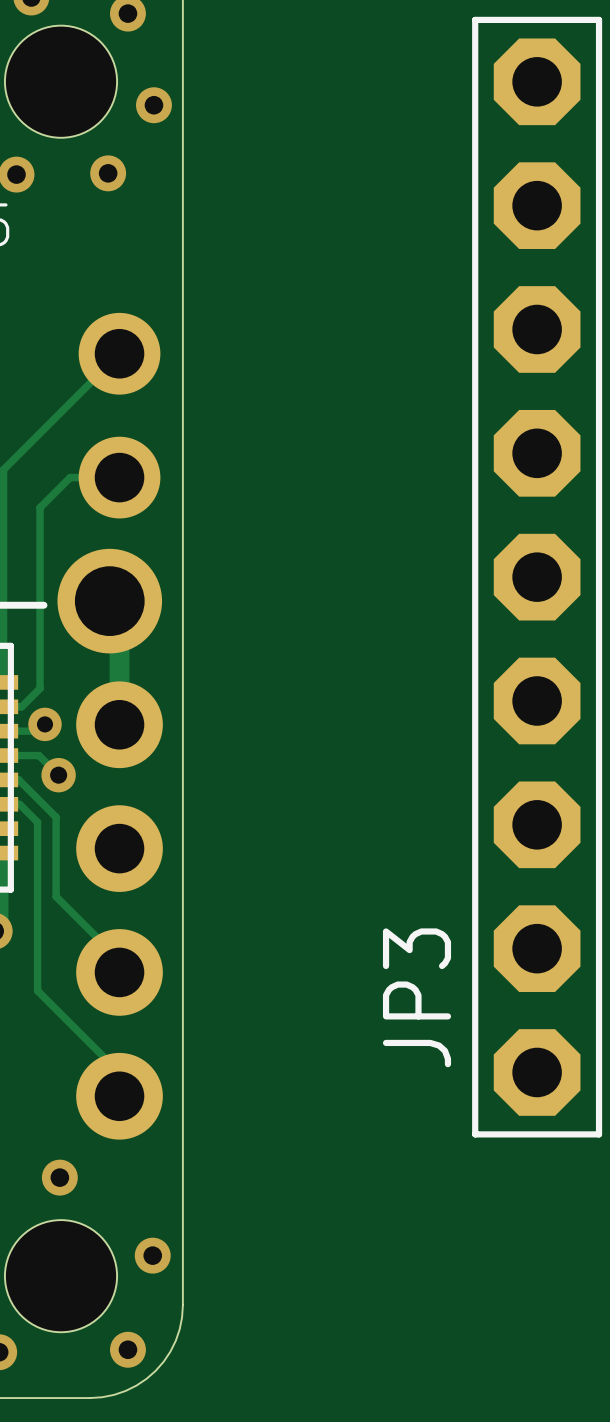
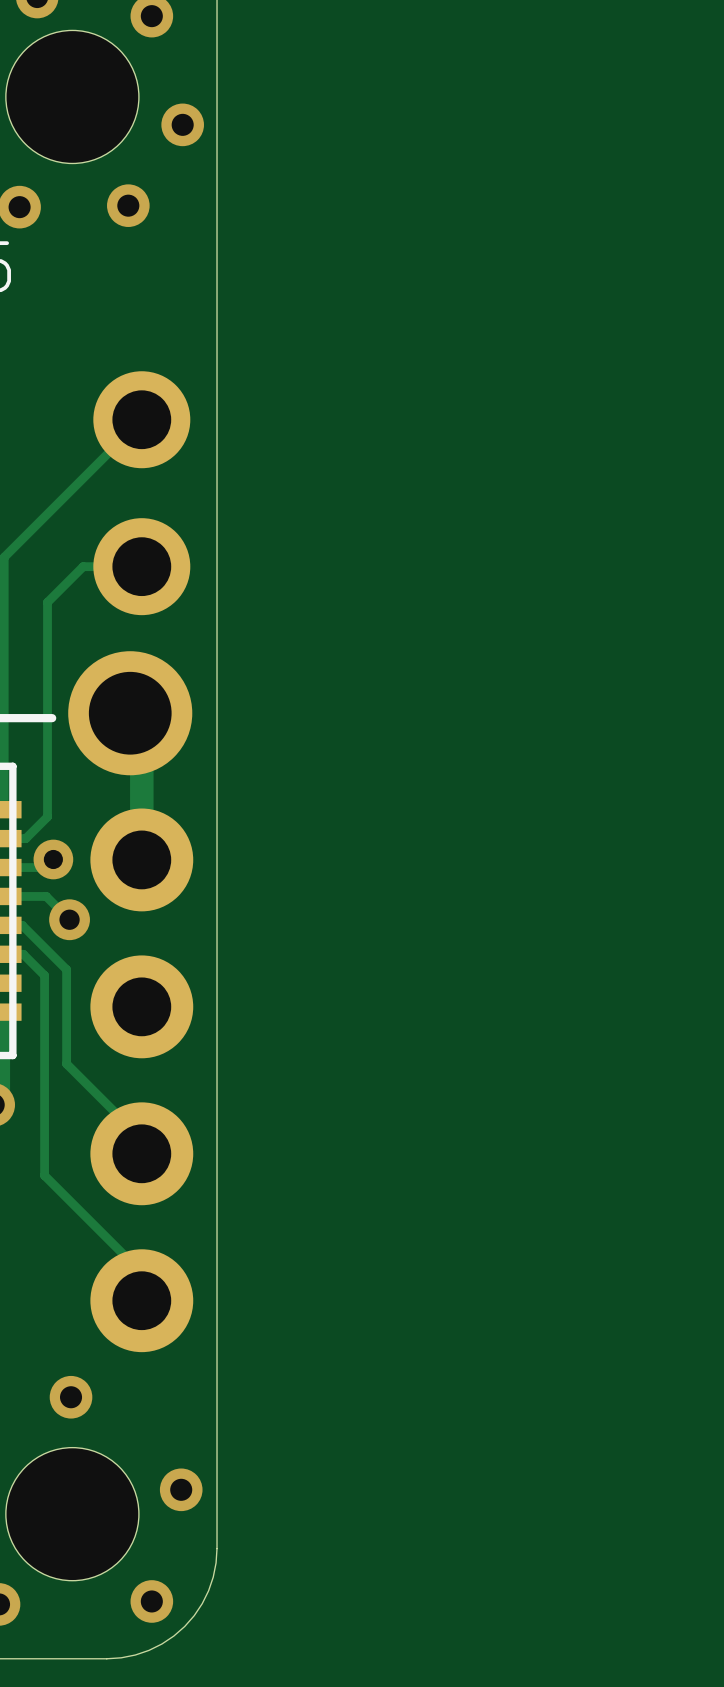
JP3: (537, 577) -> none

